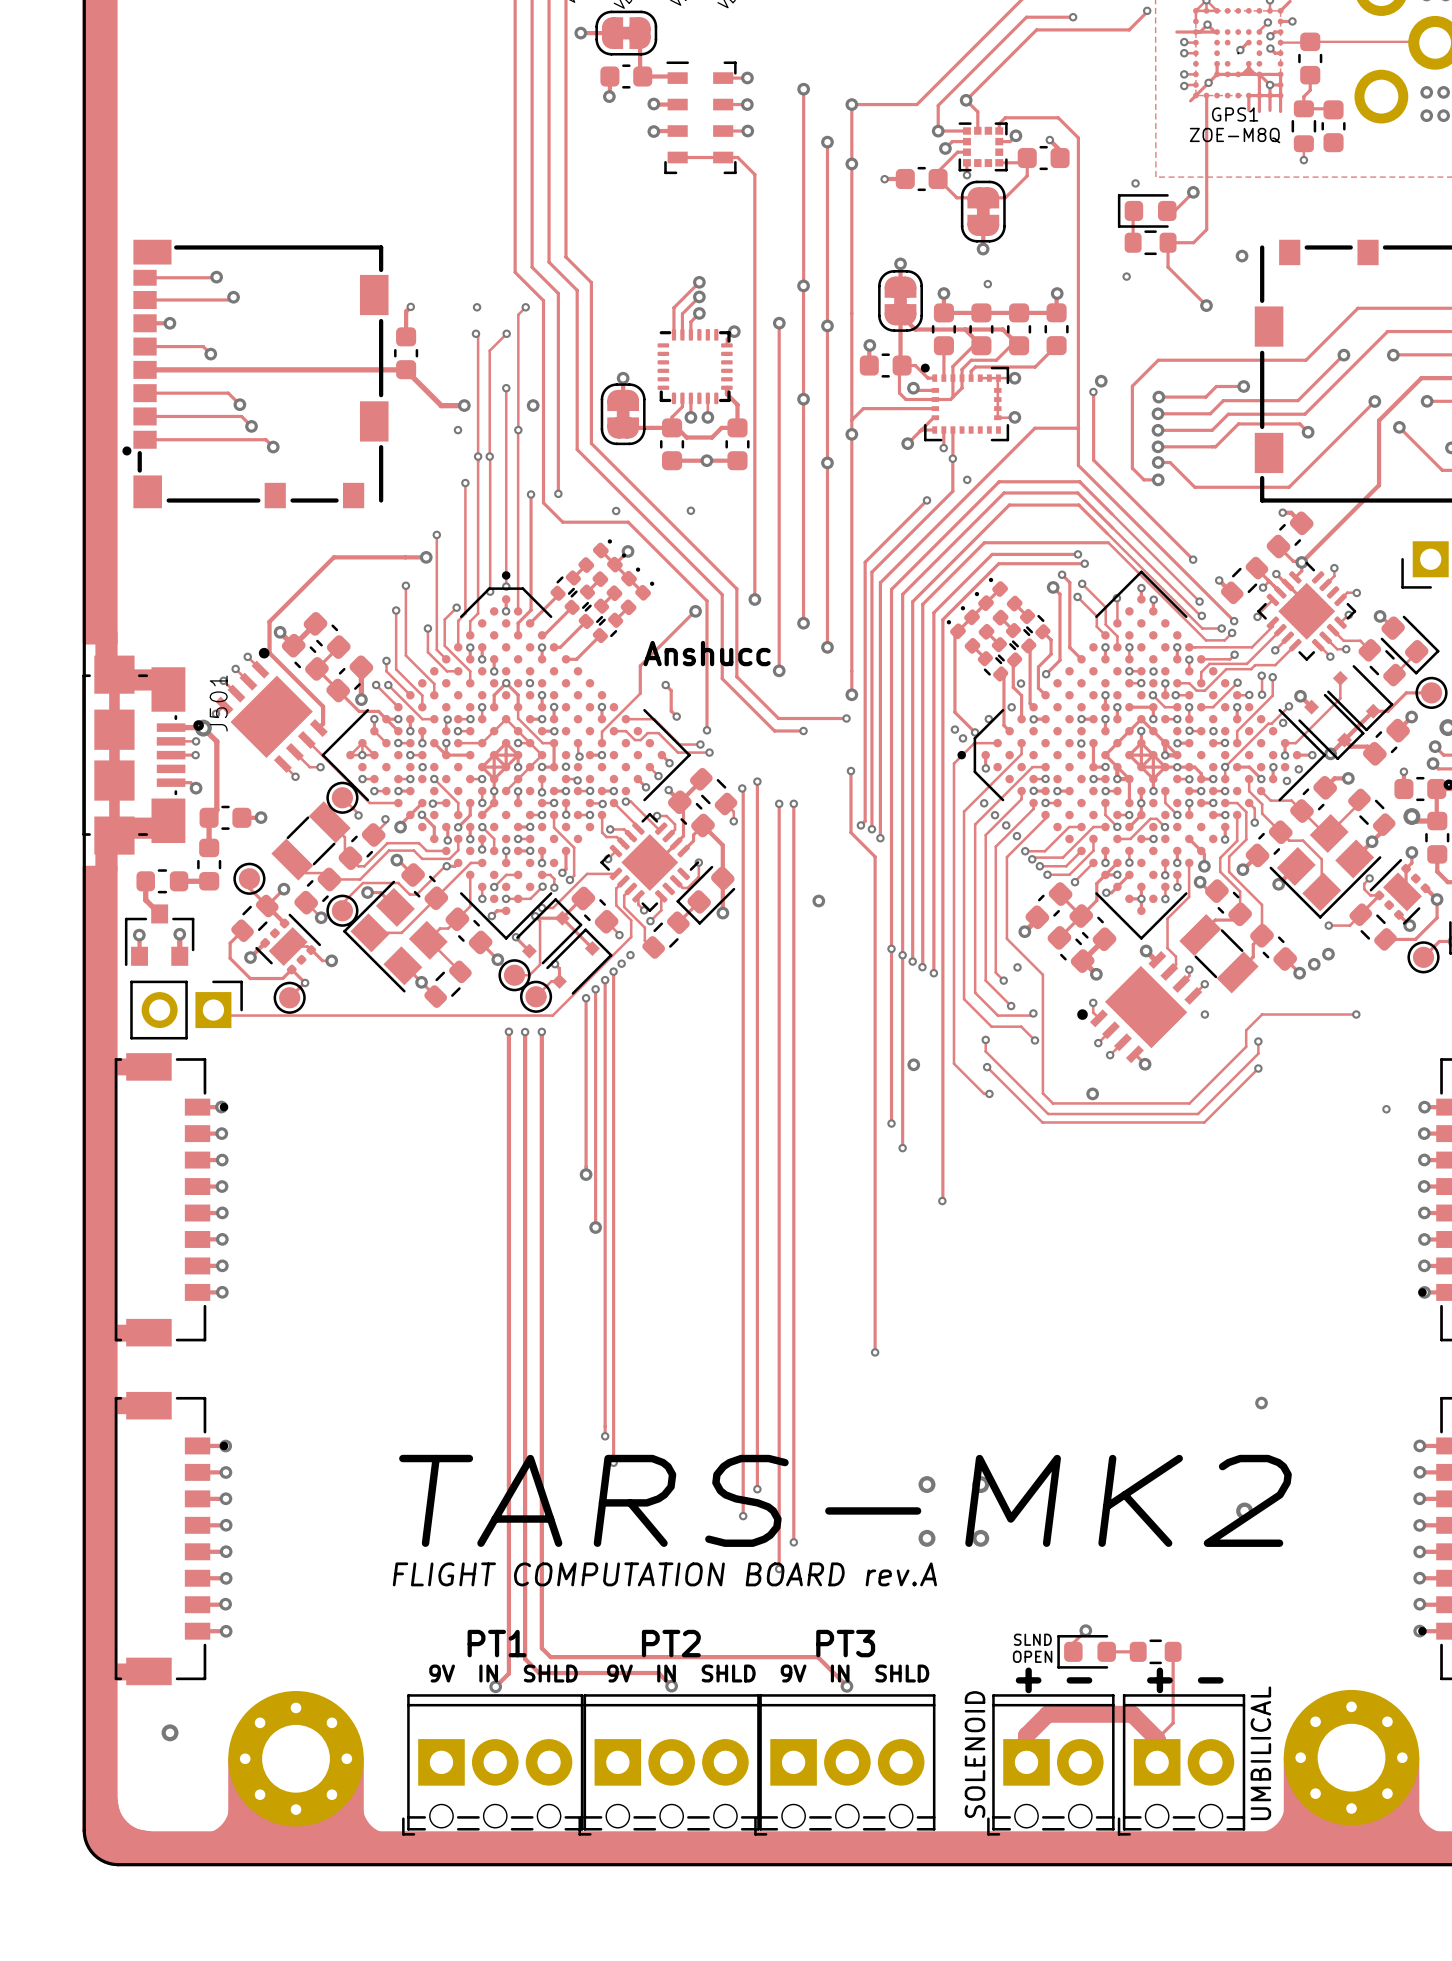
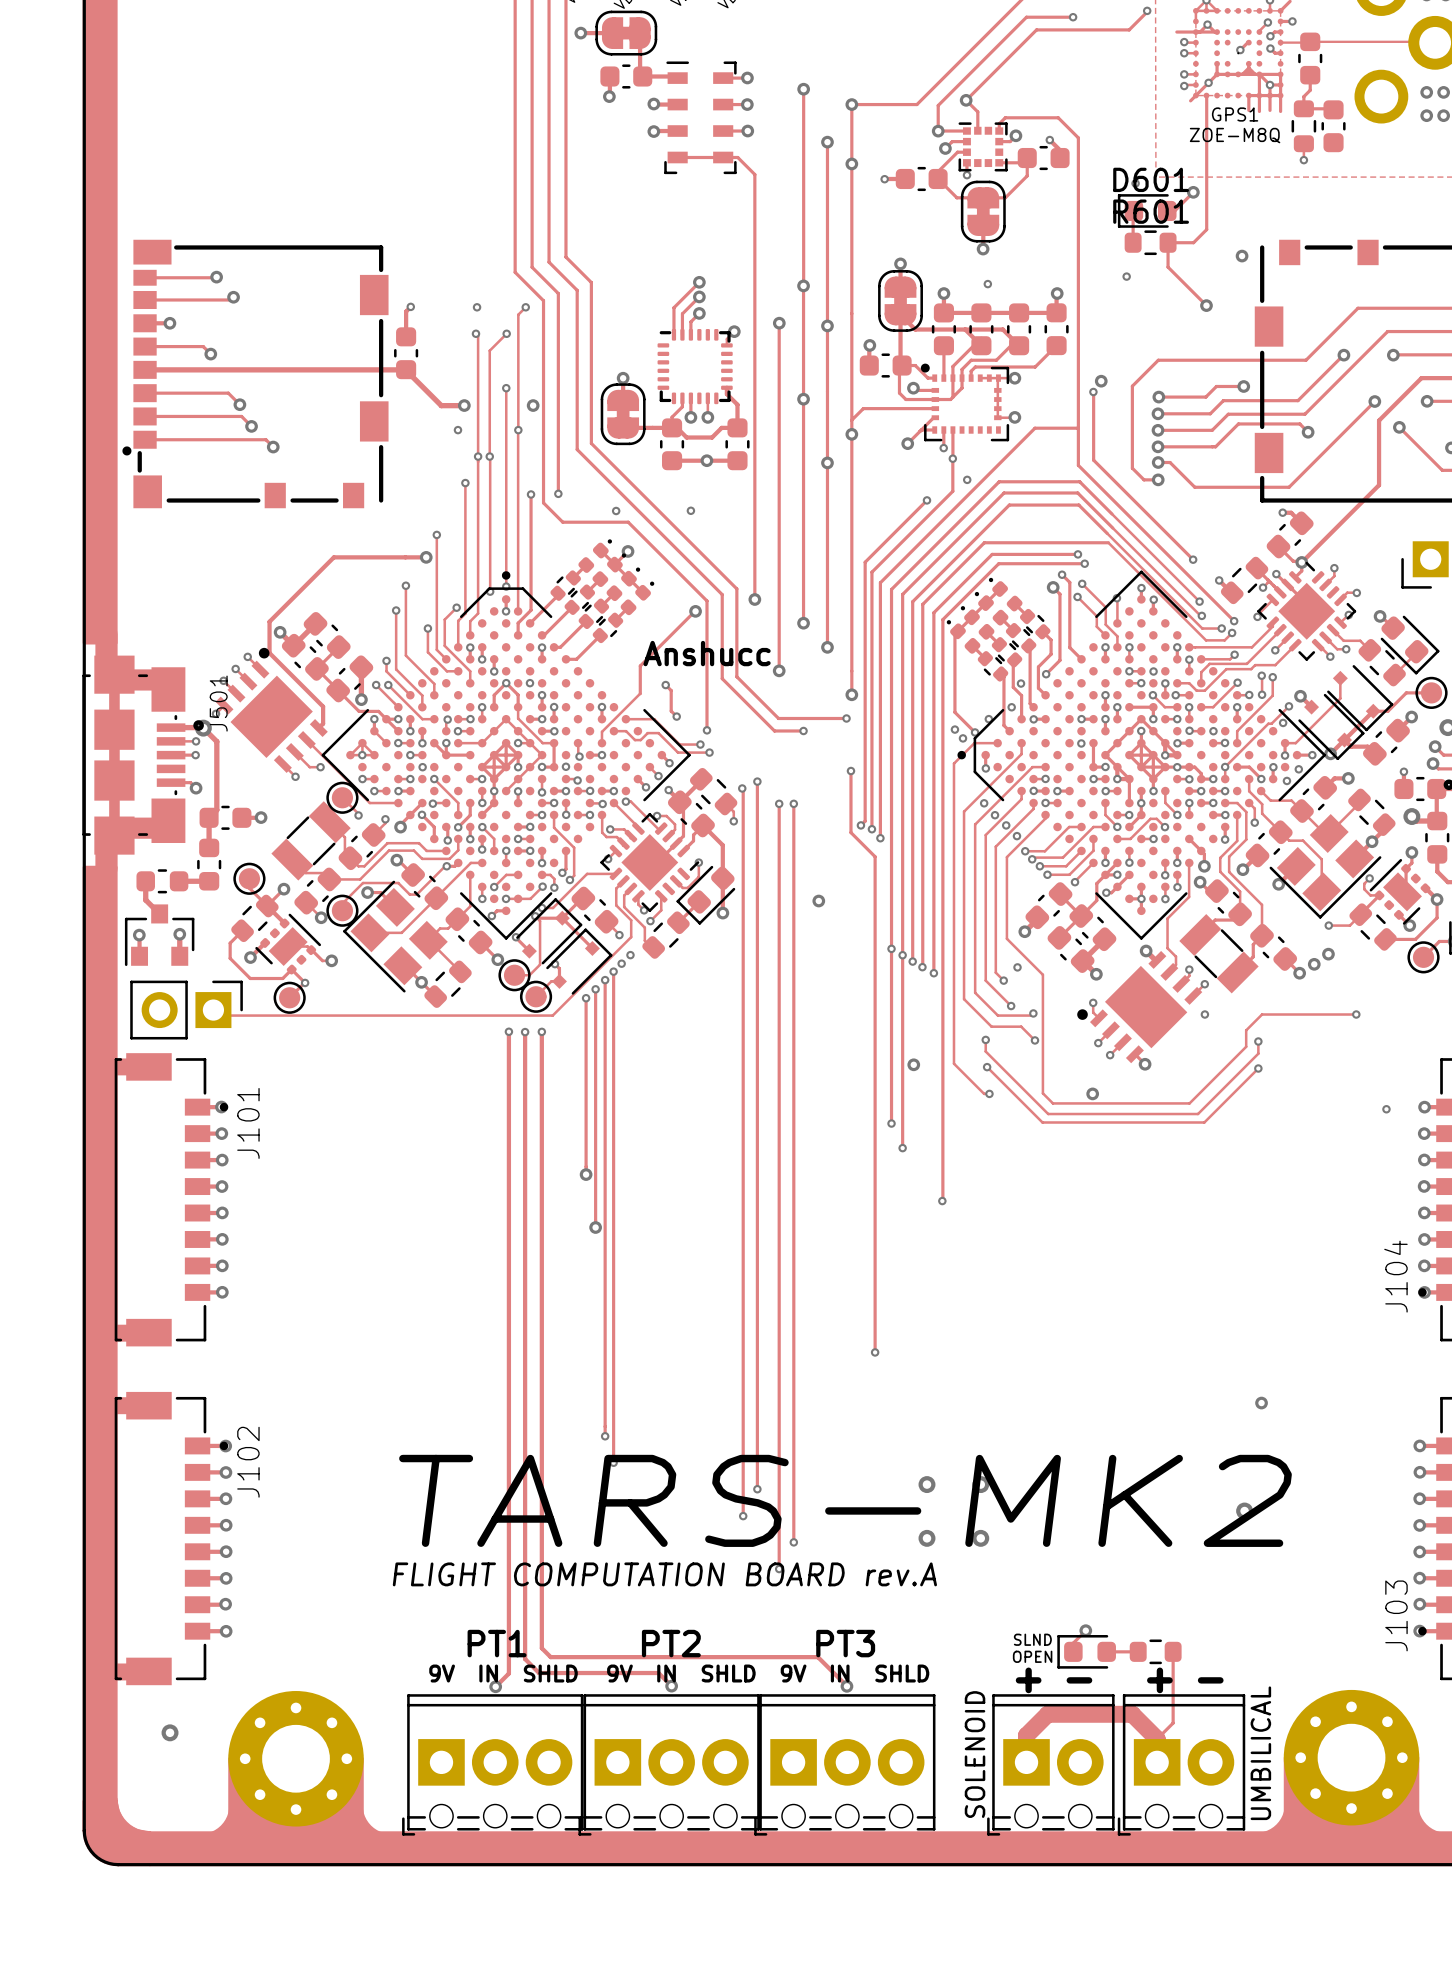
D601 name: none -> D601 (1151, 179)
R601 name: none -> R601 (1151, 211)
J101 name: none -> J101 (248, 1123)
J104 name: none -> J104 (1395, 1276)
J102 name: none -> J102 (248, 1462)
J103 name: none -> J103 (1396, 1615)

